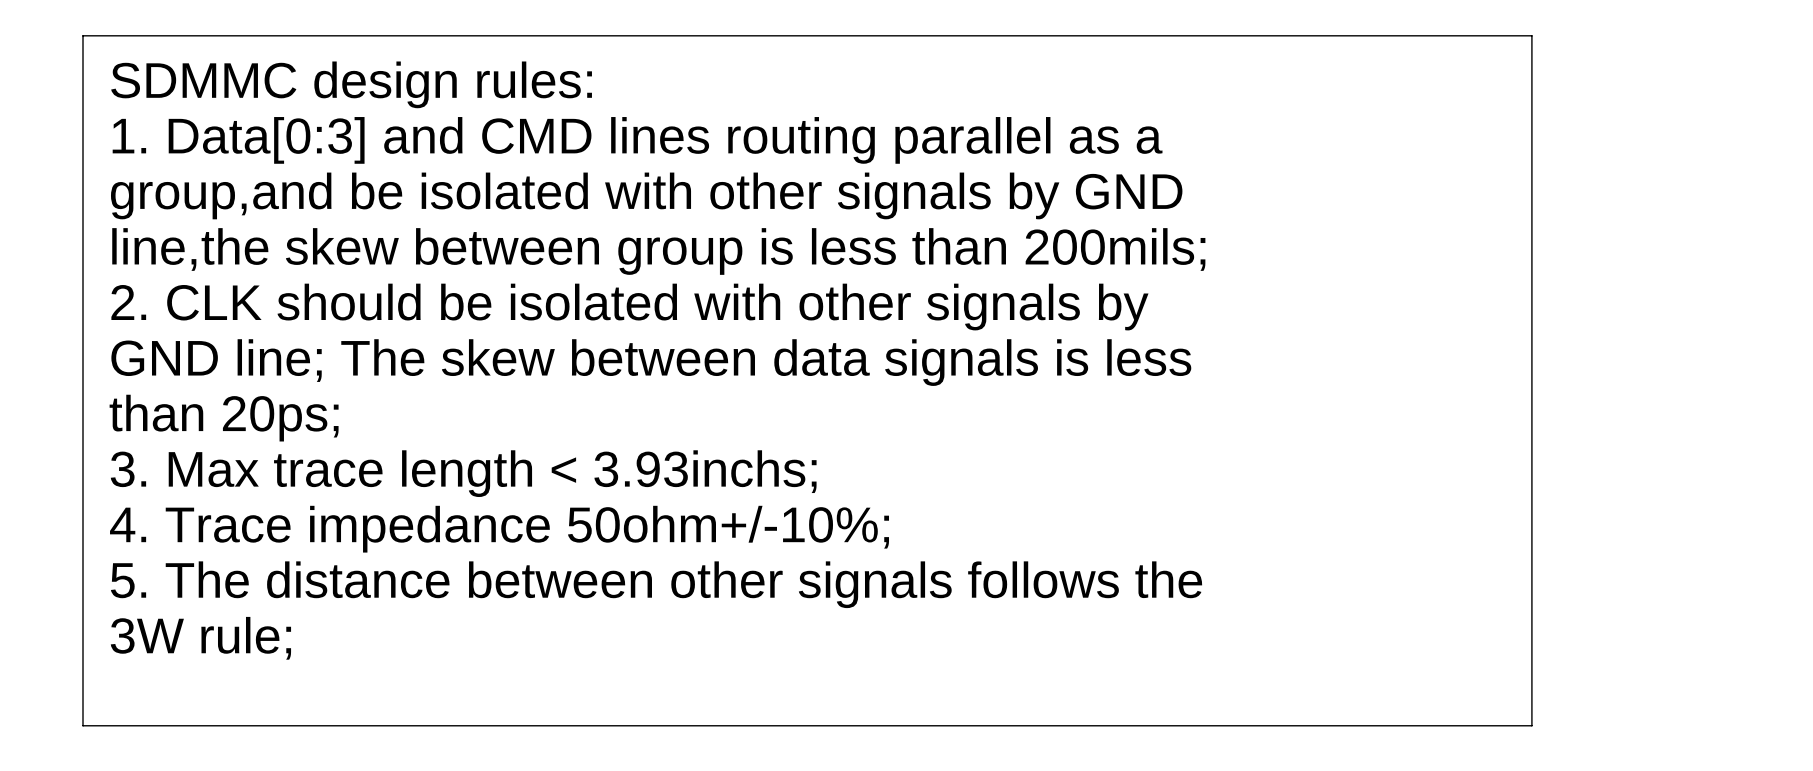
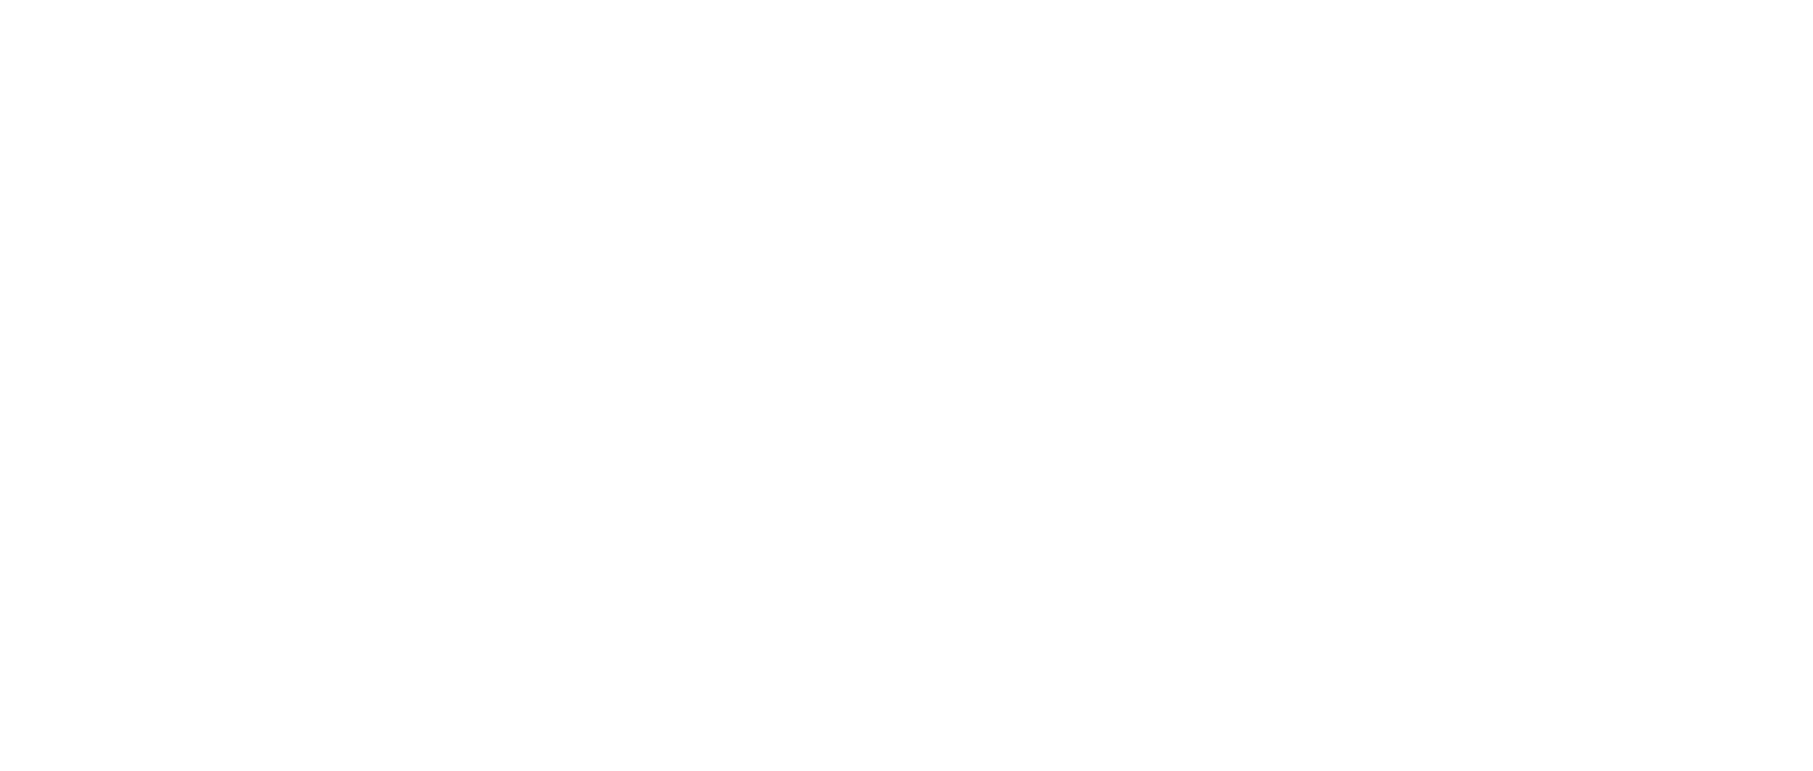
line: (82, 35) (1531, 35) (1531, 725) (82, 725) (82, 35) -> none
text: SDMMC design rules: (351, 84) -> none
text: 1. Data[0:3] and CMD lines routing parallel as a (637, 140) -> none
text: group,and be isolated with other signals by GND (646, 195) -> none
text: line,the skew between group is less than 200mils; (658, 251) -> none
text: 2. CLK should be isolated with other signals by (629, 307) -> none
text: GND line; The skew between data signals is less (651, 362) -> none
text: than 20ps; (224, 418) -> none
text: 3. Max trace length < 3.93inchs; (463, 473) -> none
text: 4. Trace impedance 50ohm+/-10%; (499, 529) -> none
text: 5. The distance between other signals follows the (656, 584) -> none
text: 3W rule; (200, 638) -> none

